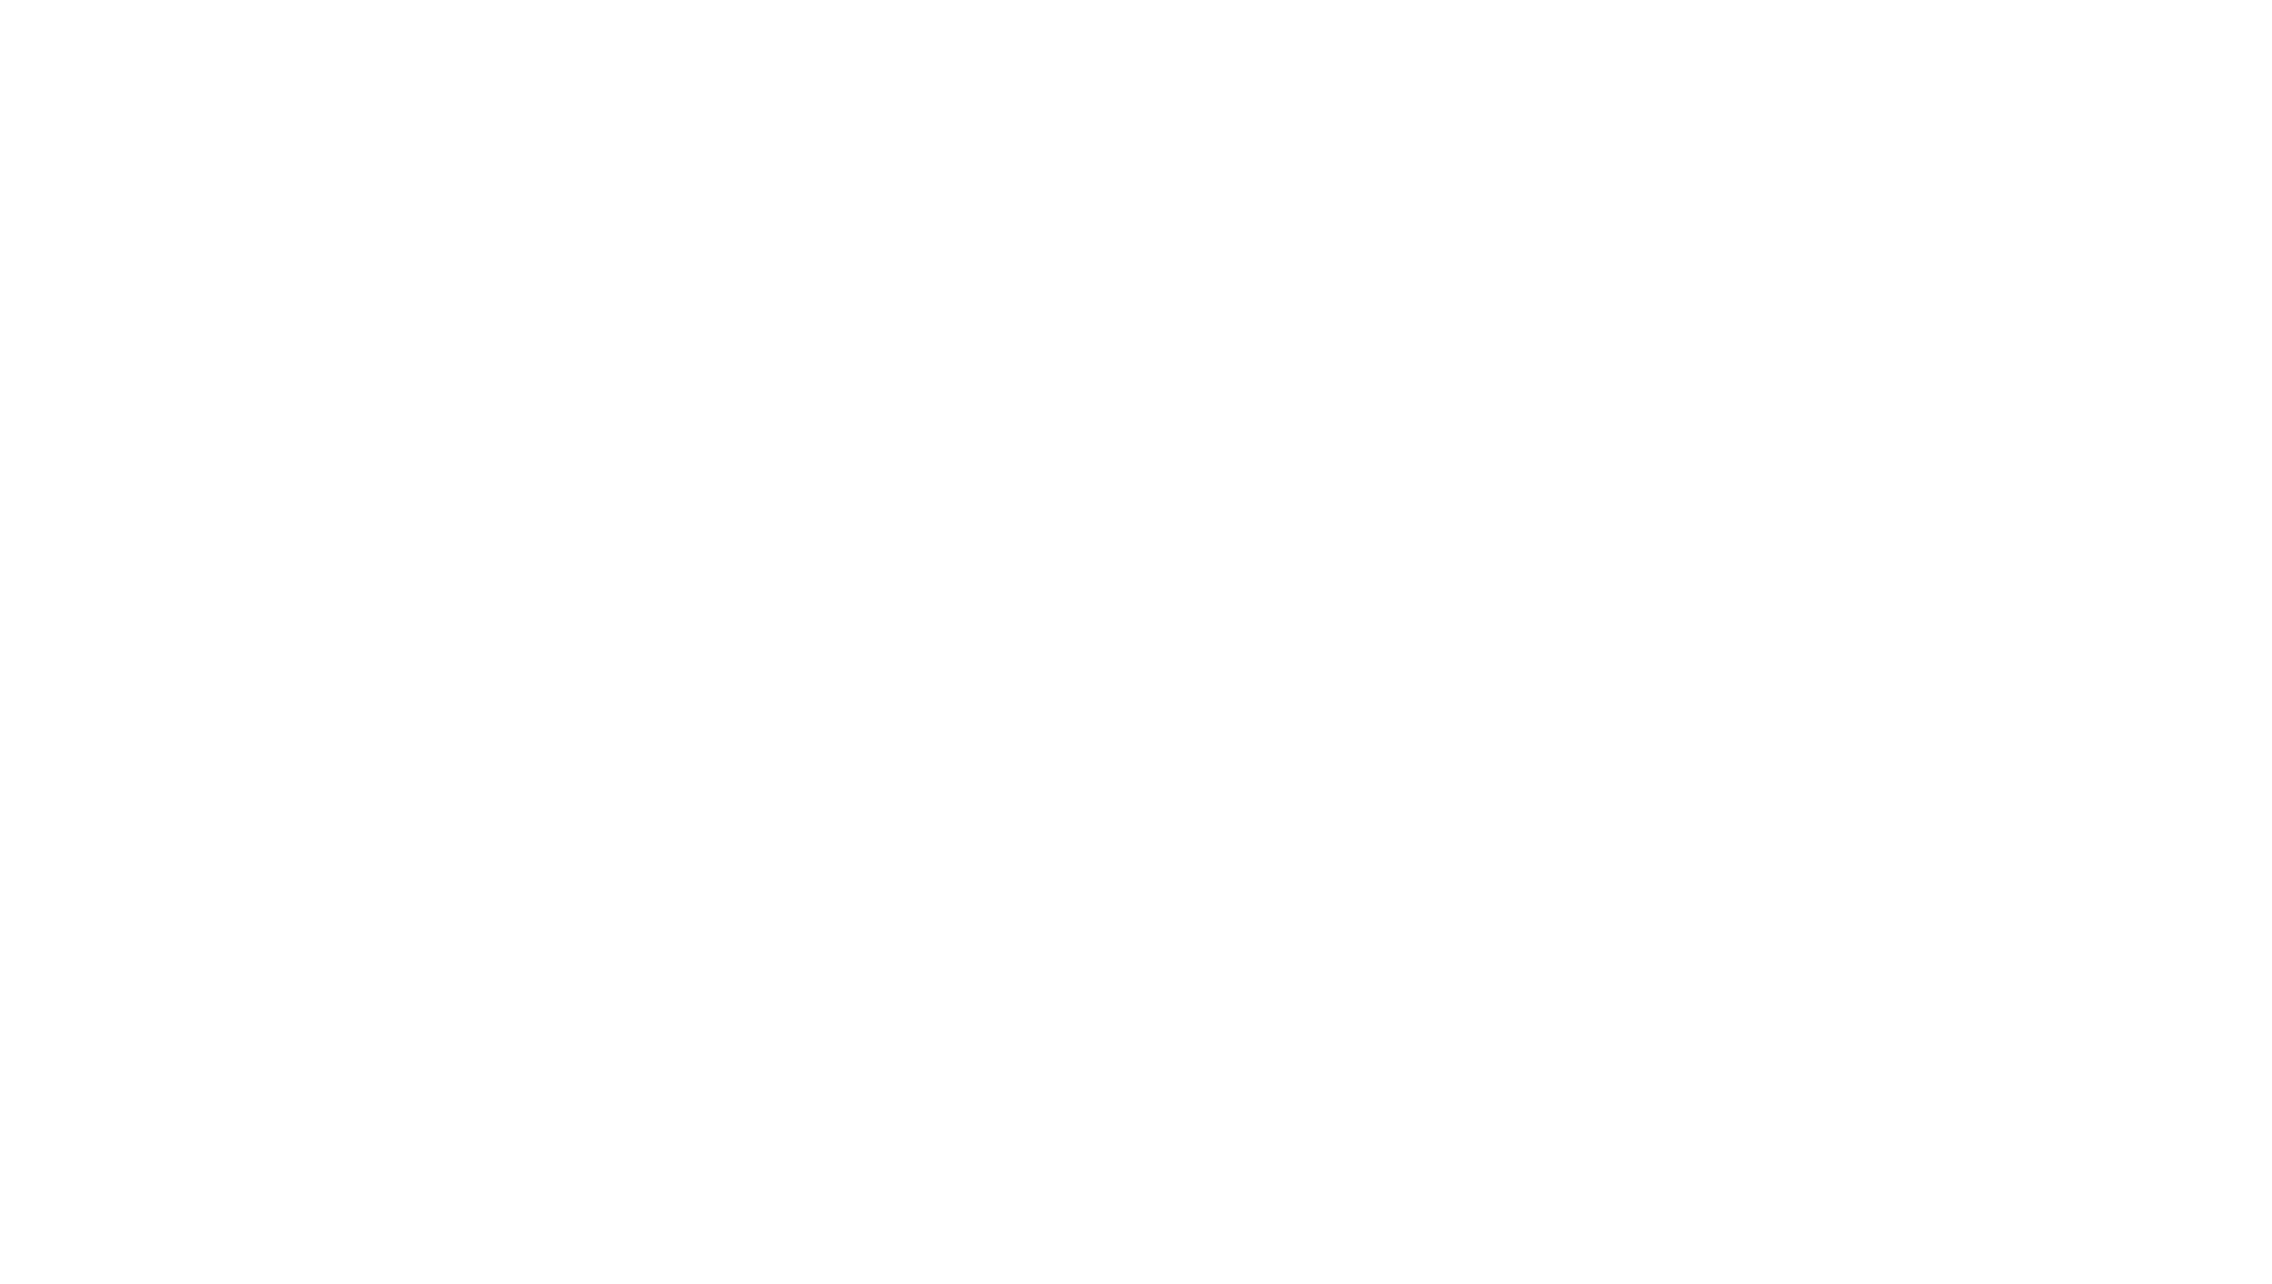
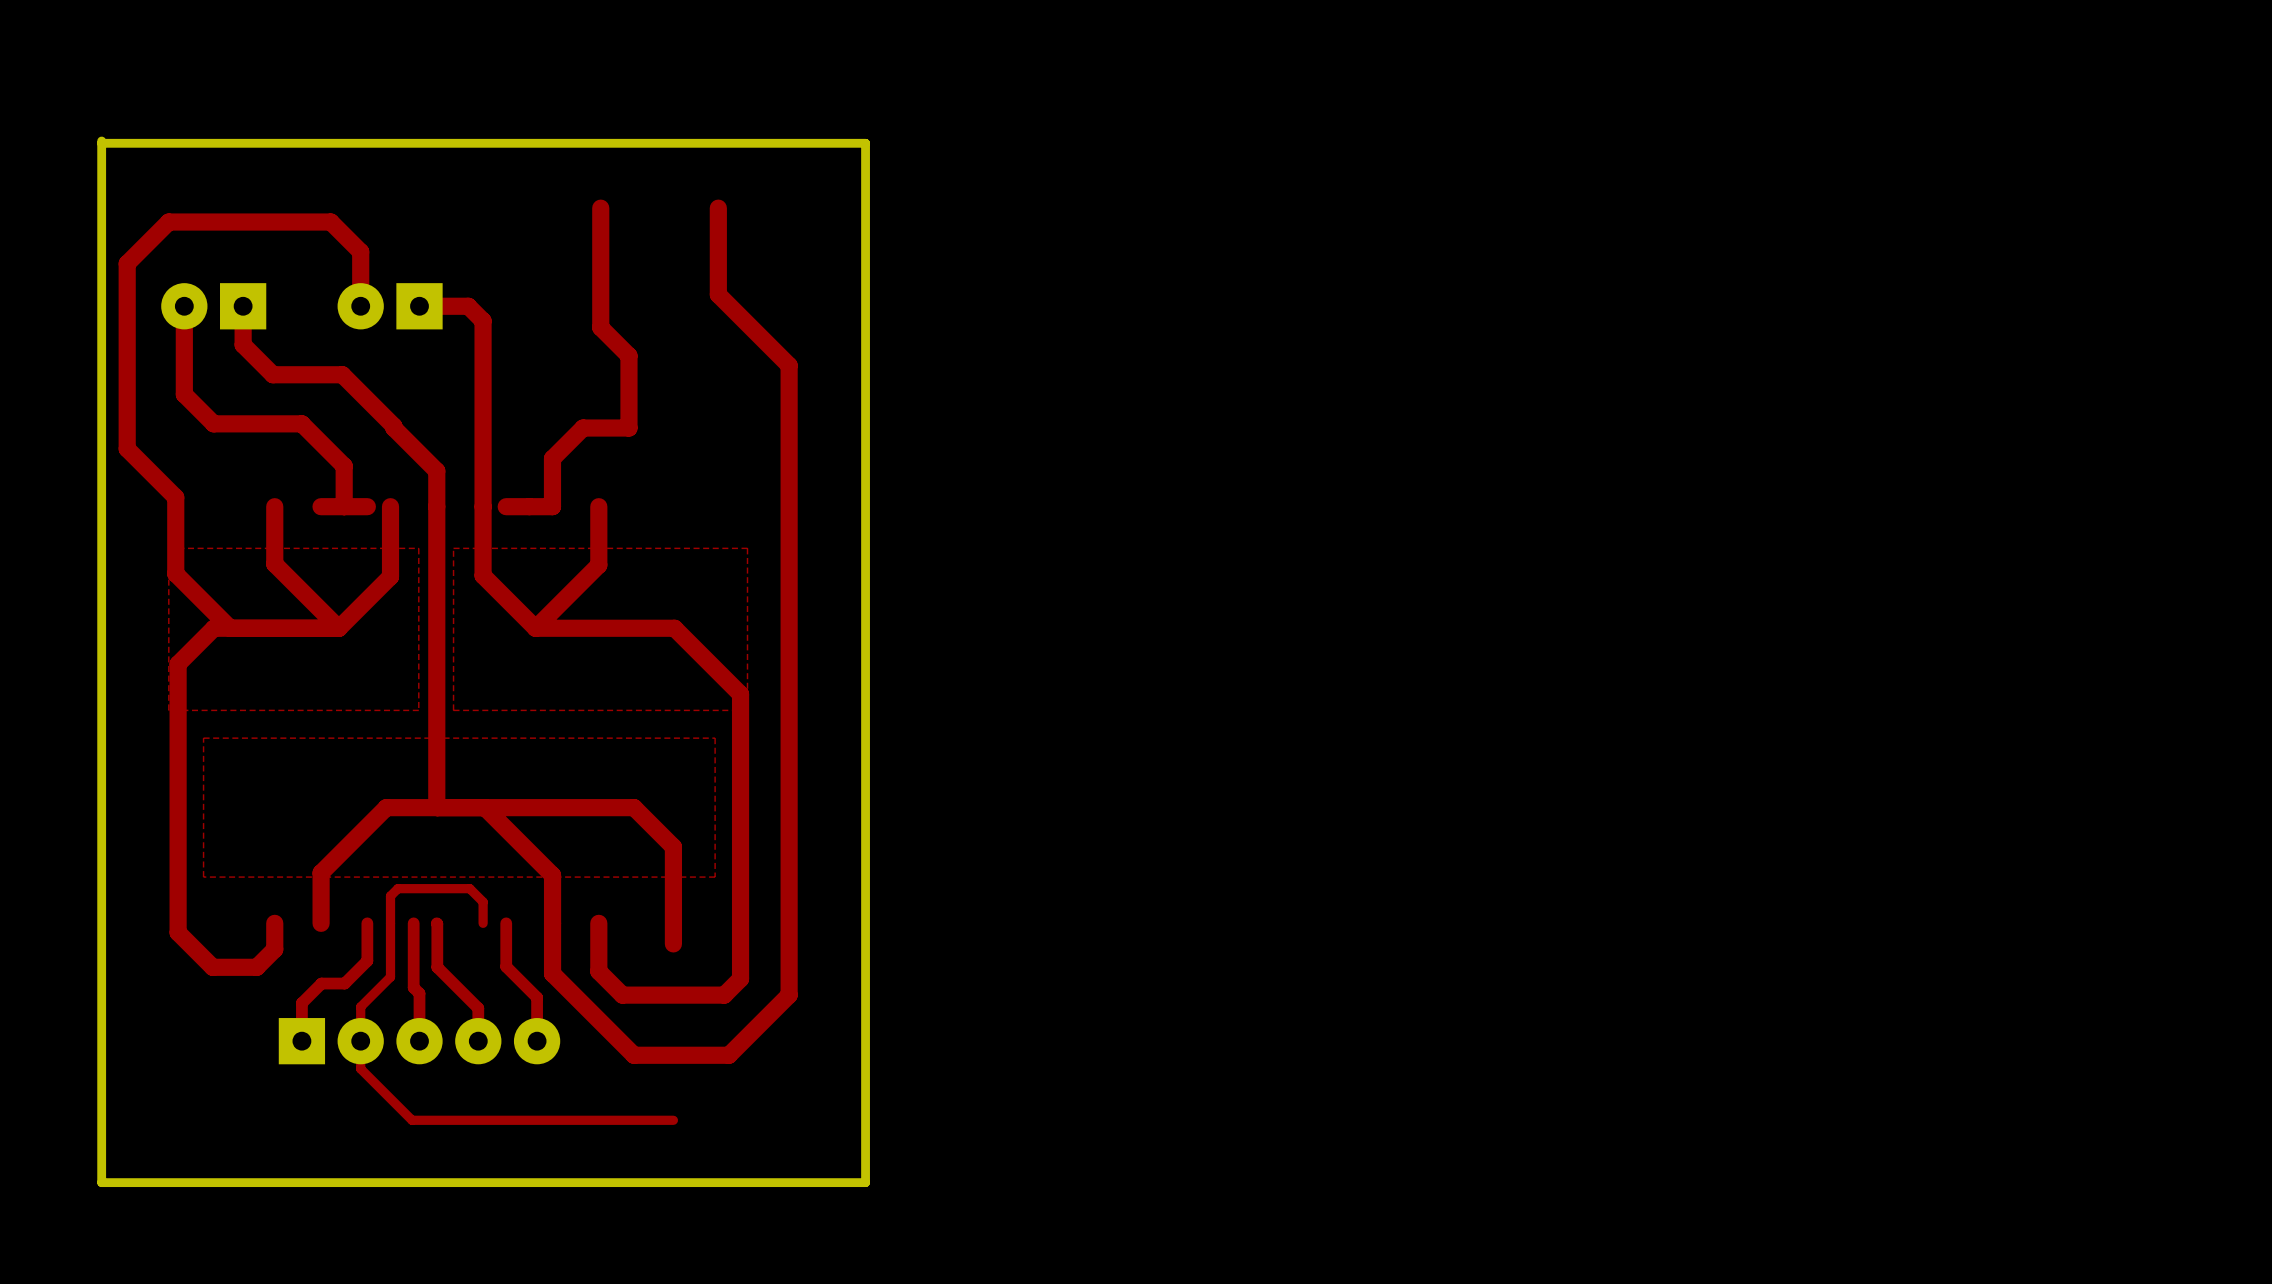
board edge: none -> (101, 141) (101, 1182) (865, 1182) (865, 143) (101, 143)
top track: none -> (600, 208) (600, 327) (628, 355) (628, 428) (583, 428) (552, 458) (552, 506) (506, 506)
top track: none -> (718, 208) (718, 294) (789, 365) (789, 995) (728, 1055) (634, 1055) (552, 973) (552, 875) (484, 807)
top track: none -> (184, 306) (184, 394) (213, 423) (301, 423) (344, 466) (344, 506)
part: none -> (213, 306)
top track: none -> (243, 306) (243, 344) (272, 374) (342, 374) (436, 471) (437, 807)
top track: none -> (360, 306) (360, 251) (330, 222) (168, 222) (127, 263) (127, 448) (175, 497) (175, 573) (230, 628)
part: none -> (390, 306)
top track: none -> (419, 306) (468, 306) (483, 320) (483, 575) (535, 628)
top track: none -> (274, 506) (274, 564) (338, 628)
top track: none -> (367, 506) (321, 506)
top track: none -> (390, 506) (390, 576) (338, 628)
top track: none -> (598, 506) (598, 565) (535, 628)
top zone outline: none -> (418, 548) (168, 548) (168, 710) (418, 710) (418, 548)
top zone outline: none -> (747, 548) (453, 548) (453, 710) (747, 710) (747, 548)
top track: none -> (338, 628) (213, 628) (178, 664) (178, 932) (212, 967) (256, 967) (274, 949) (274, 923)
top track: none -> (535, 628) (674, 628) (740, 694) (740, 978) (724, 995) (622, 995) (598, 971) (598, 923)
top zone outline: none -> (715, 738) (203, 738) (203, 877) (715, 877) (715, 738)
top track: none -> (321, 923) (321, 872) (386, 807) (634, 807) (673, 846) (673, 943)
top track: none -> (367, 923) (367, 960) (344, 983) (321, 983) (301, 1003) (301, 1041)
top track: none -> (413, 923) (413, 987) (419, 993) (419, 1041)
top track: none -> (436, 923) (437, 967) (478, 1008) (478, 1041)
top track: none -> (483, 923) (483, 902) (469, 888) (397, 888) (390, 896) (390, 977) (360, 1006) (360, 1068) (412, 1120) (673, 1120)
top track: none -> (506, 923) (506, 966) (537, 997) (537, 1041)
part: none -> (419, 1041)

